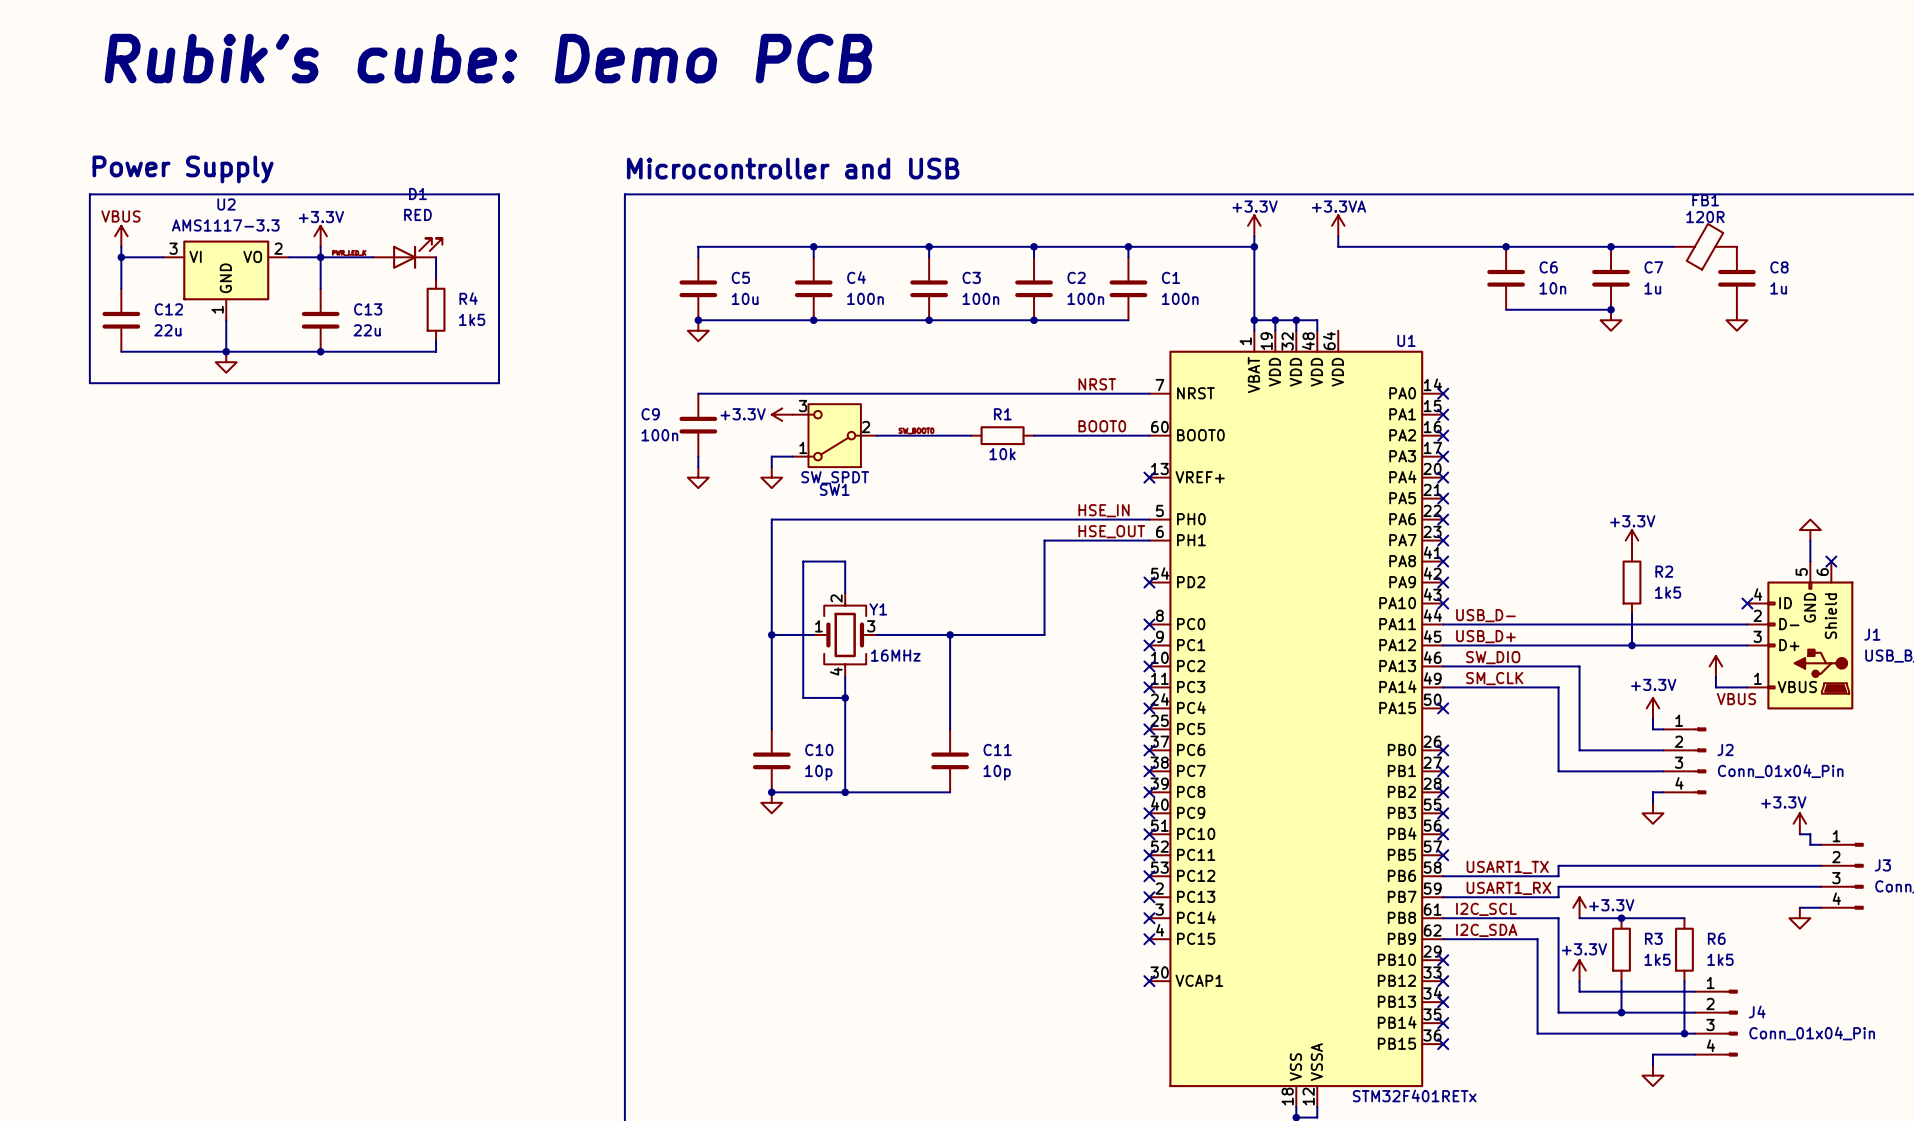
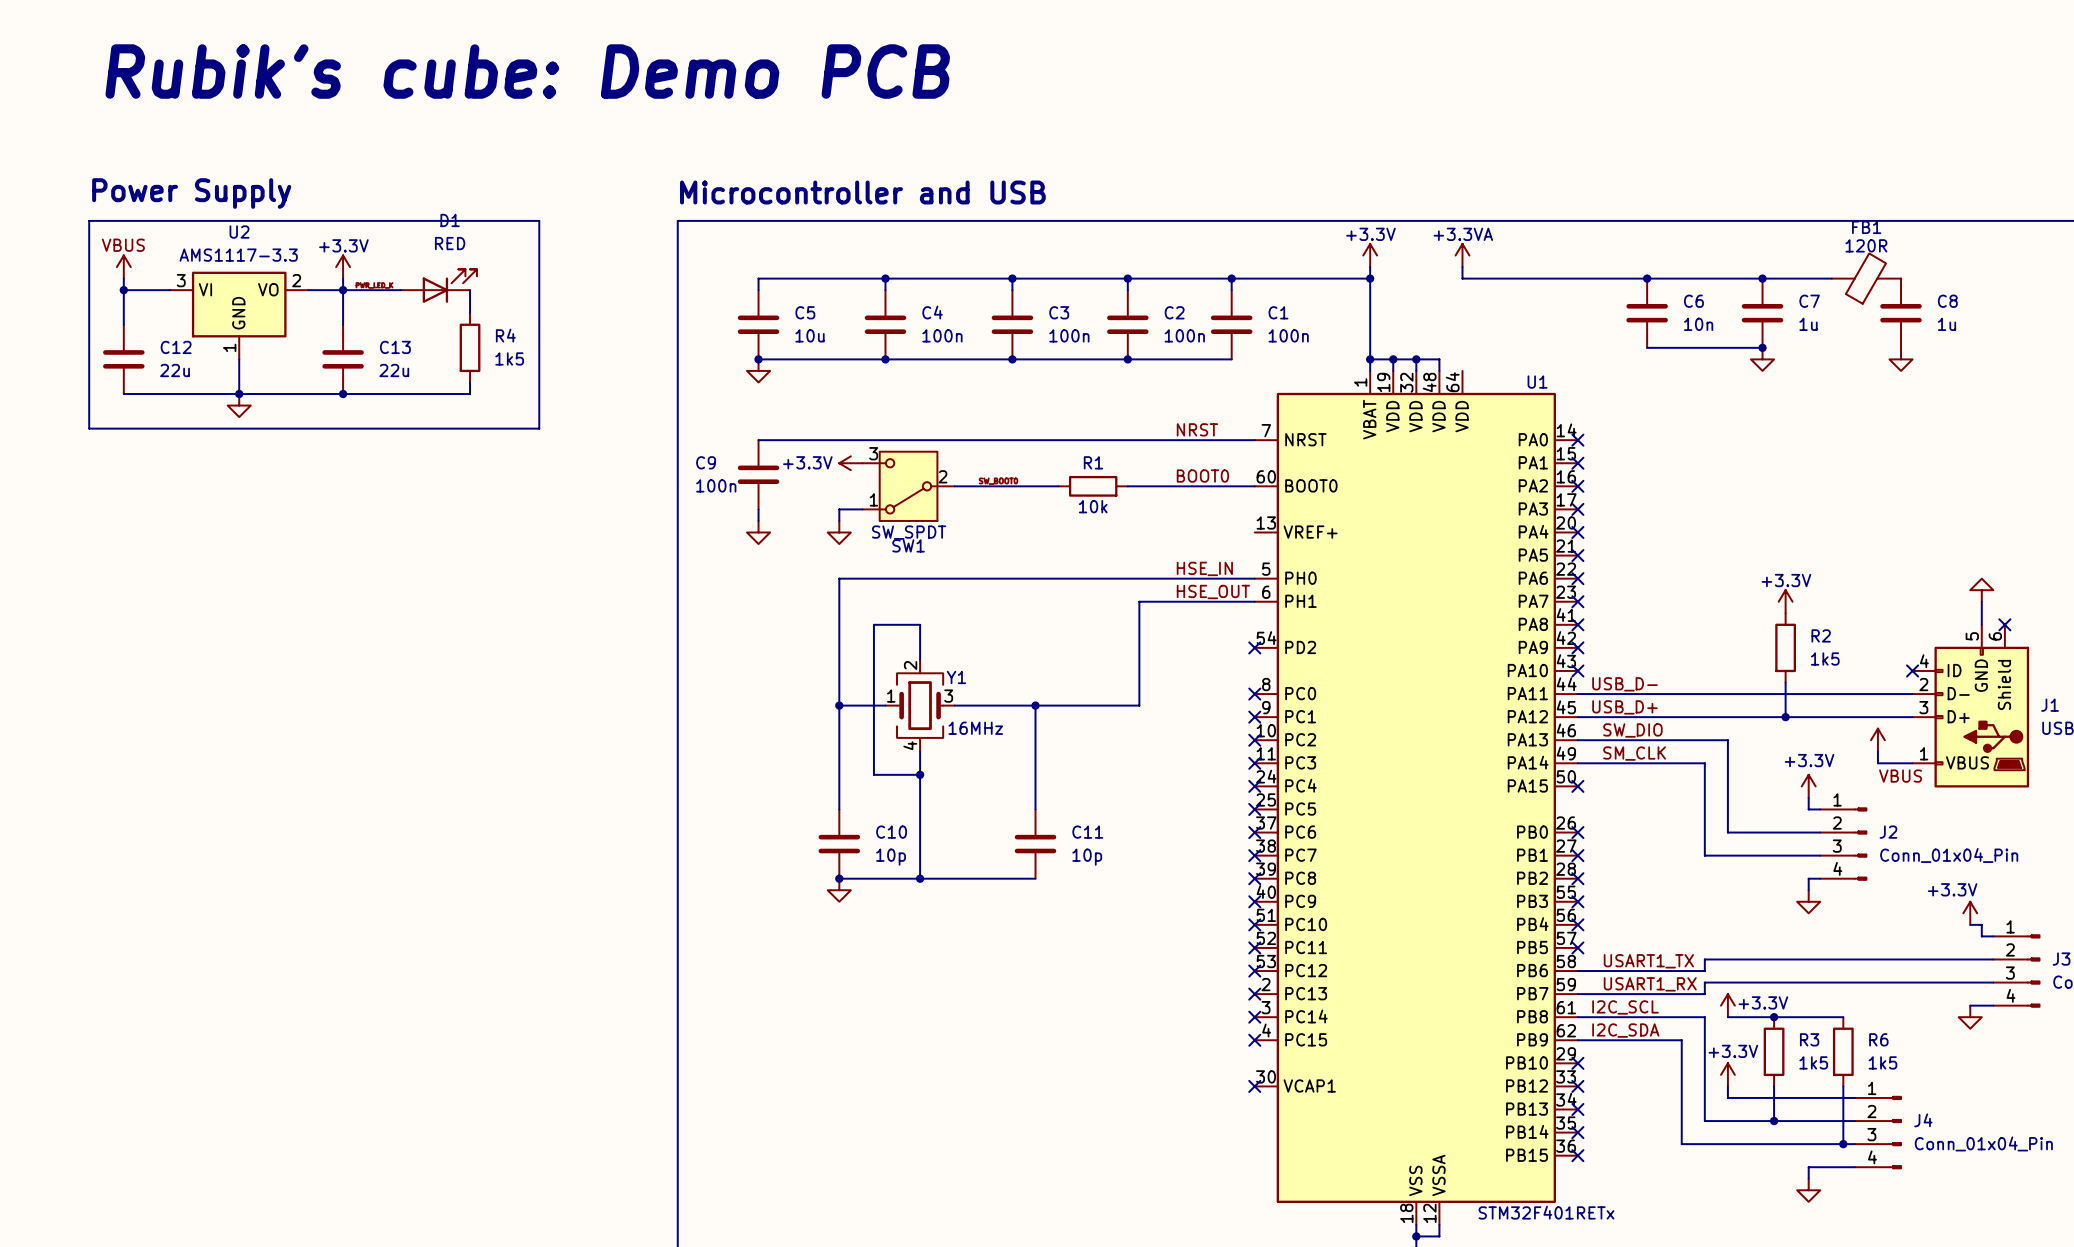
no-connect mark: (1149, 477) -> none

